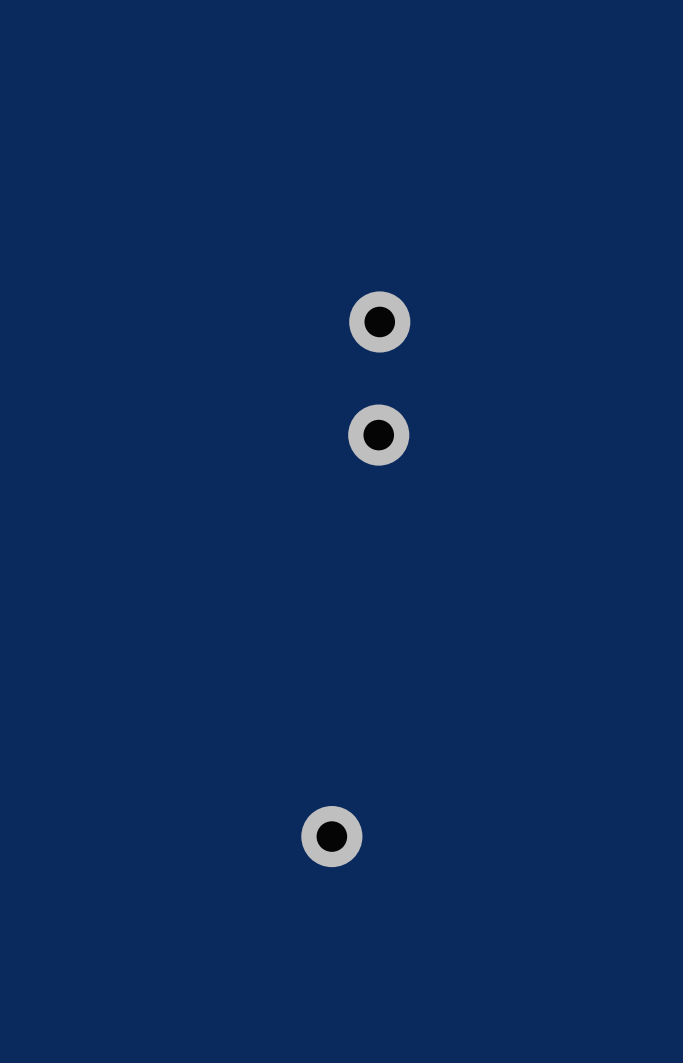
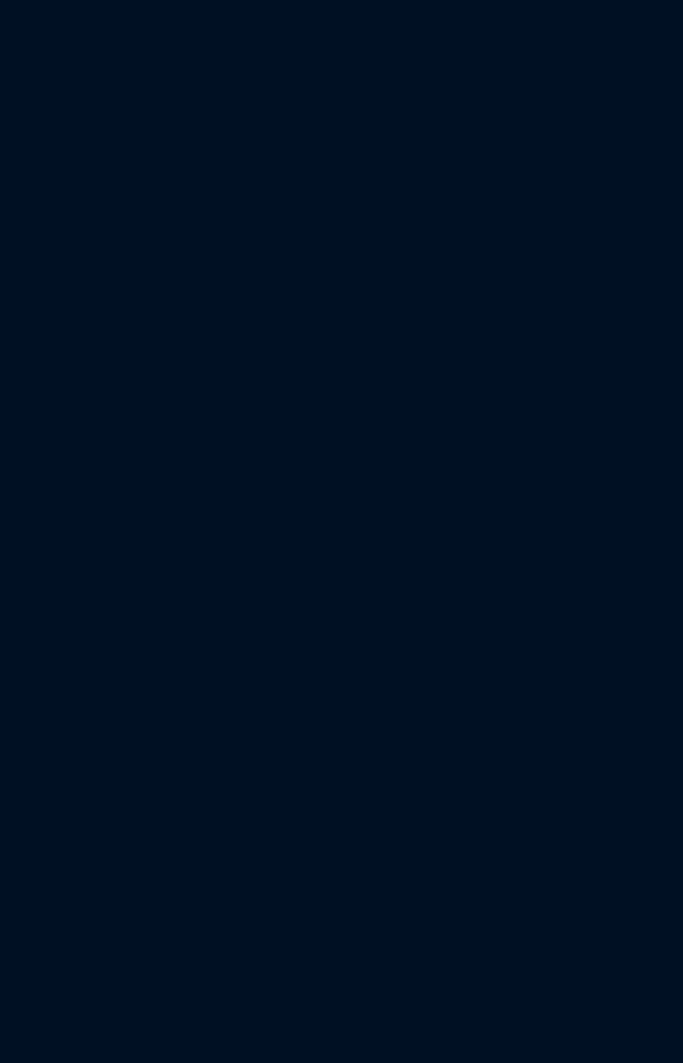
via: (379, 321) -> none
via: (378, 435) -> none
via: (331, 836) -> none

